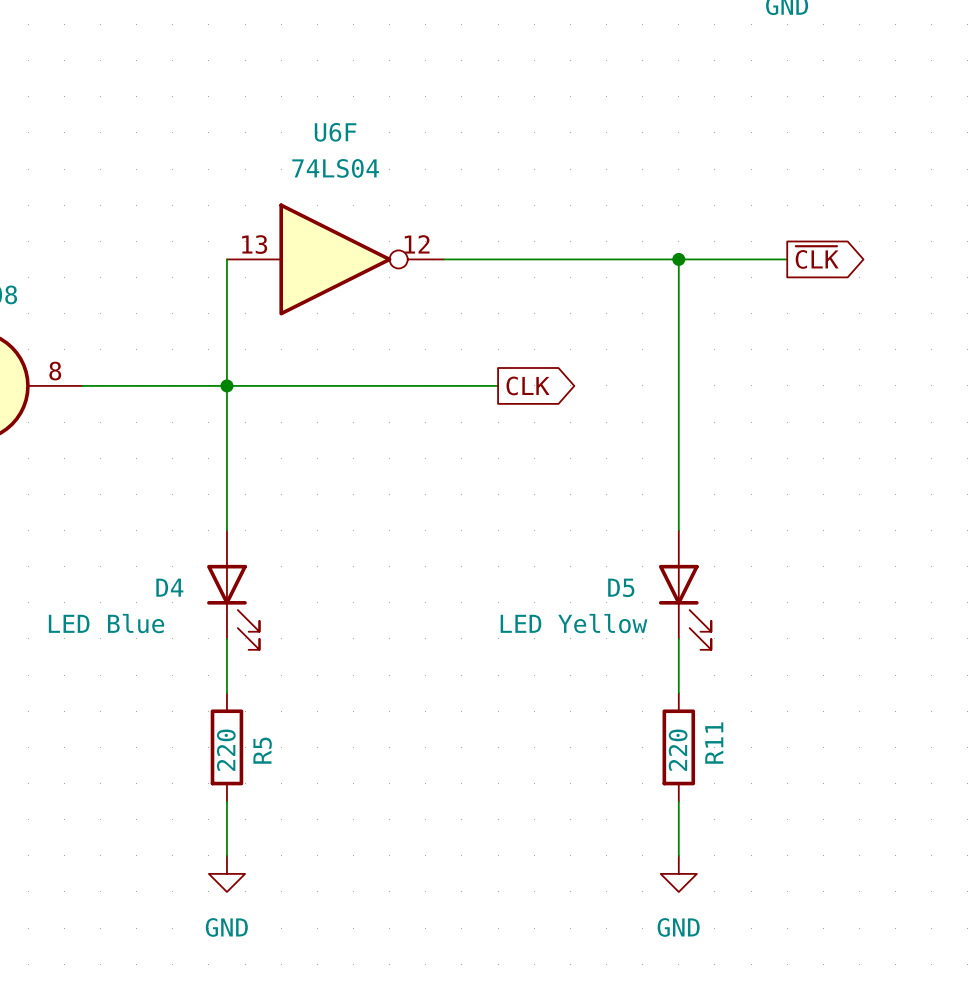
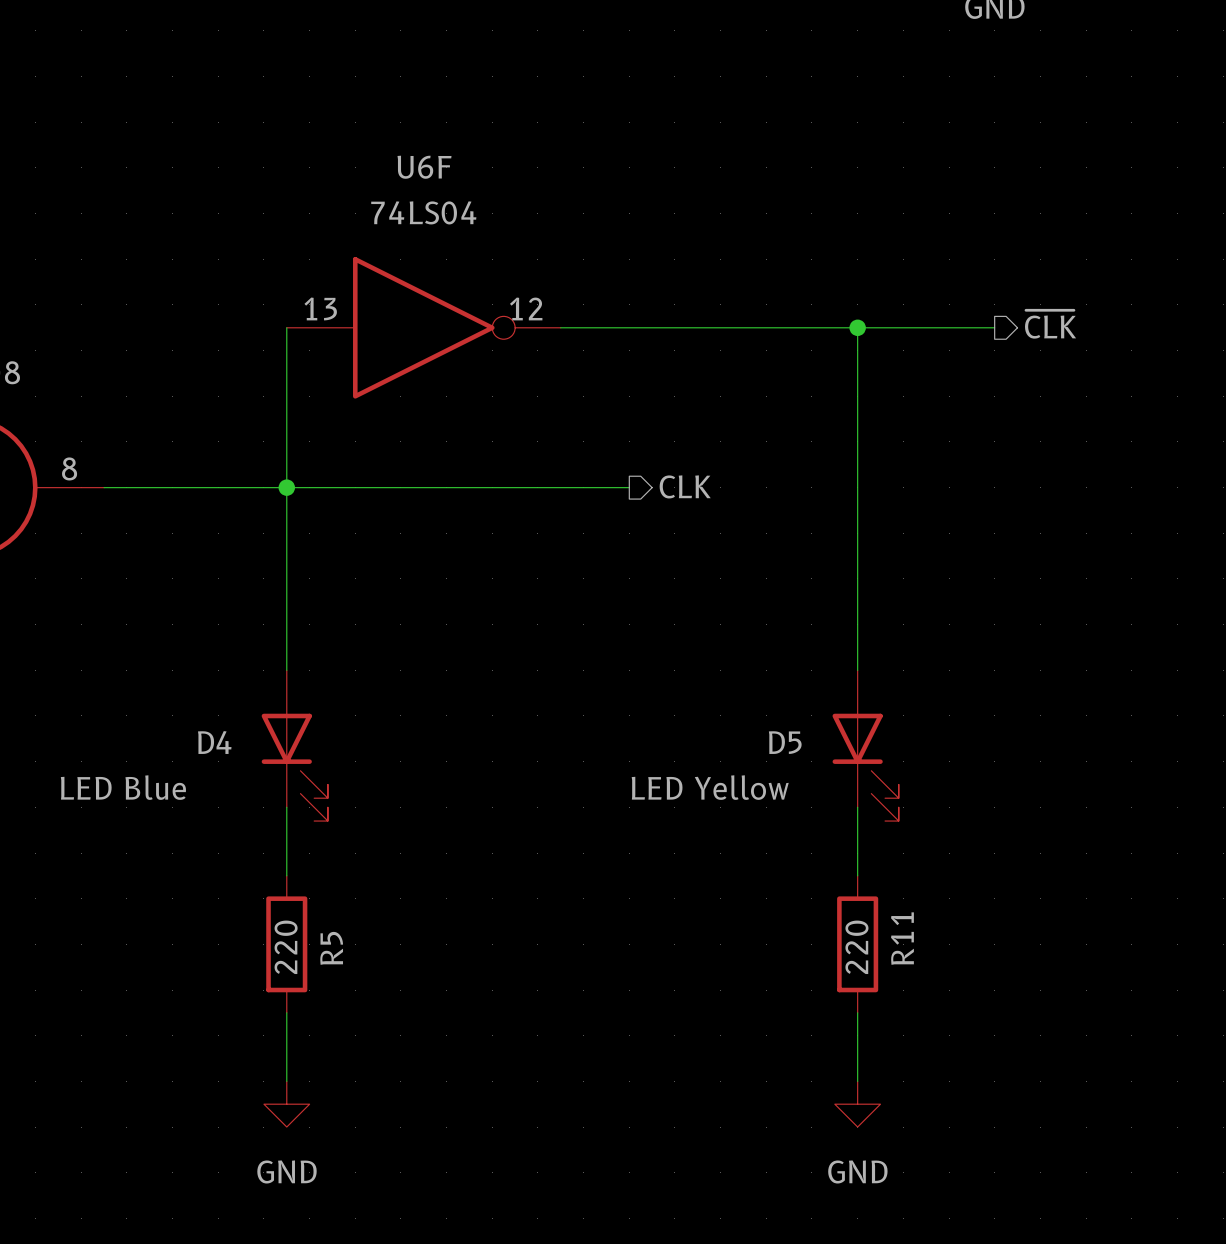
hierarchical label: none -> ~{CLK} (1050, 324)
global label: ~{CLK} (817, 257) -> none
global label: CLK (528, 385) -> none
hierarchical label: none -> CLK (685, 486)

